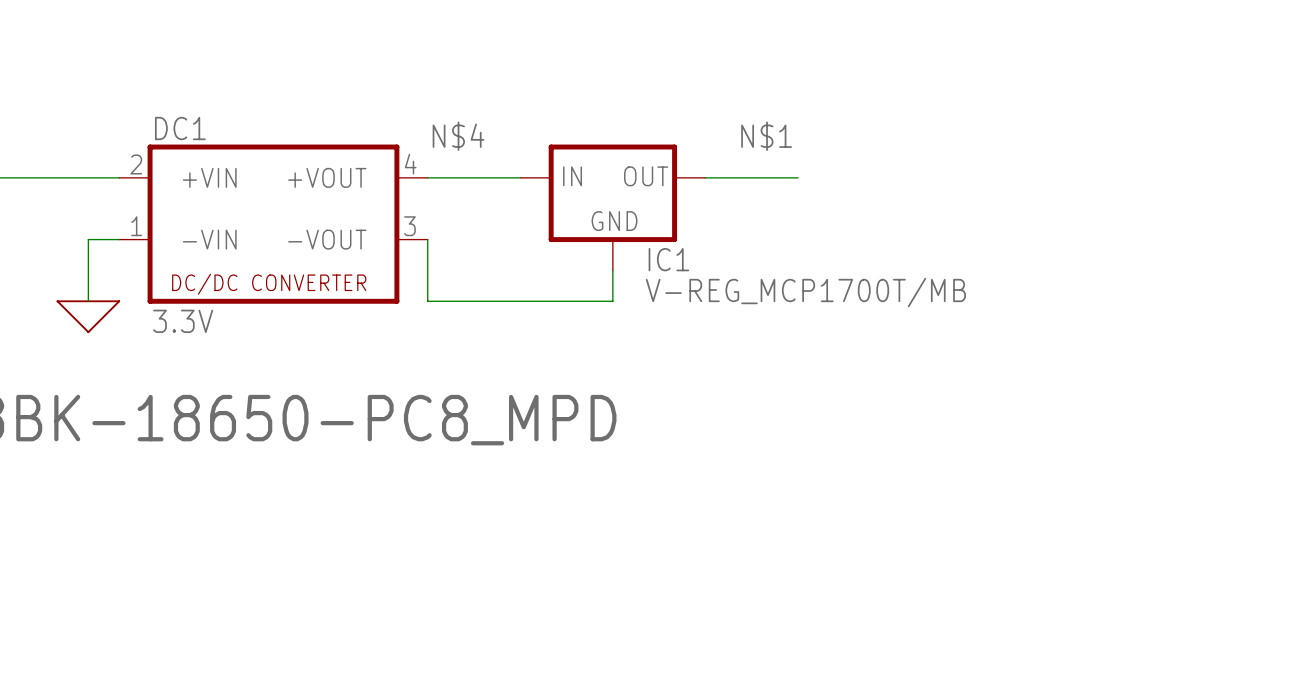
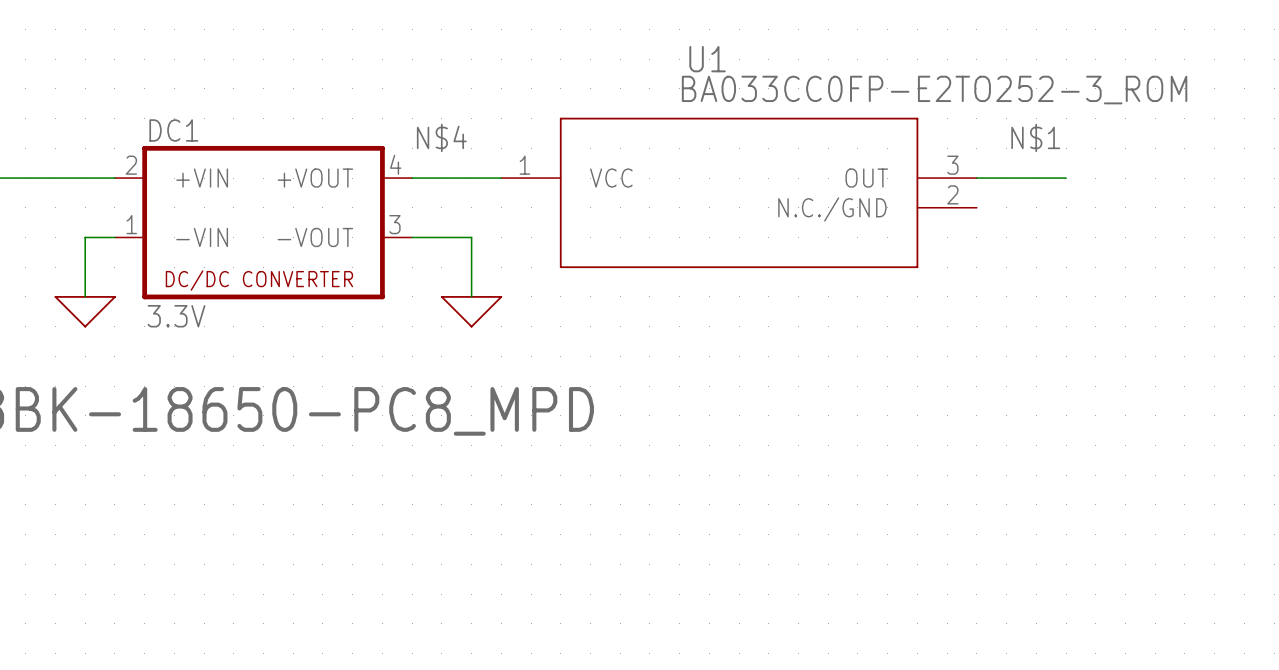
label: N$1 (766, 136) -> none
label: none -> N$1 (1035, 137)
wire: (705, 177) (797, 177) -> none
wire: none -> (976, 178) (1066, 178)
U1: none -> BA033CC0FP-E2TO252-3_ROM (739, 192)
IC1: V-REG_MCP1700T/MB (612, 207) -> none
wire: (427, 239) (427, 301) (612, 301) (612, 270) -> (412, 237) (471, 237) (471, 296)
power symbol: none -> (471, 311)

